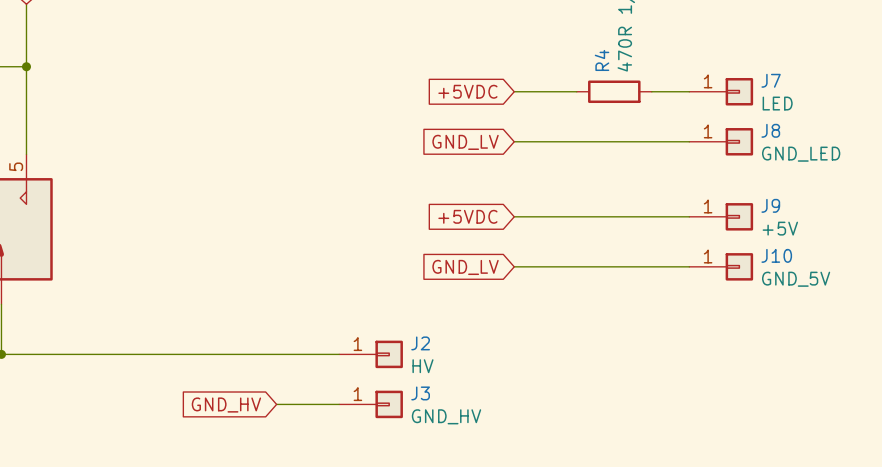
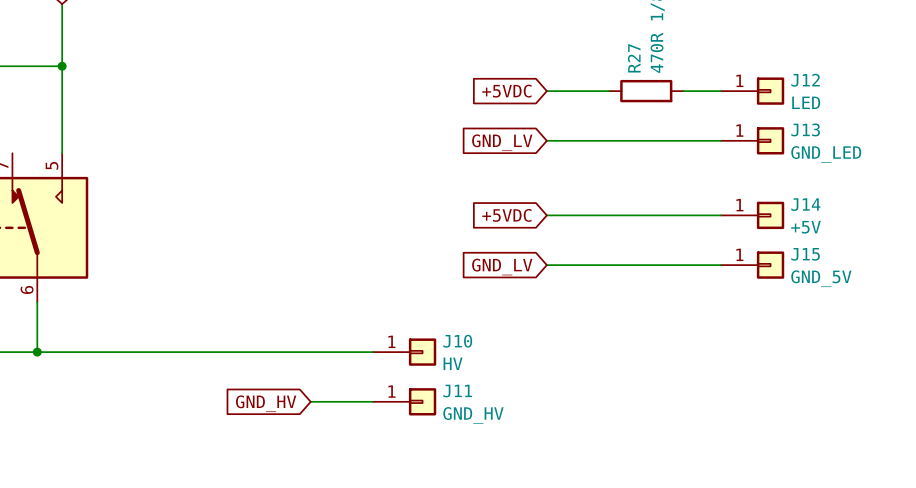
R4 name: R4 (602, 60) -> R27 (634, 58)
J7 name: J7 (771, 80) -> J12 (805, 80)
J8 name: J8 (770, 130) -> J13 (805, 129)
J9 name: J9 (770, 205) -> J14 (805, 204)
J10 name: J10 (776, 255) -> J15 (805, 254)
J2 name: J2 (420, 343) -> J10 (457, 341)
J3 name: J3 (420, 393) -> J11 (457, 391)

